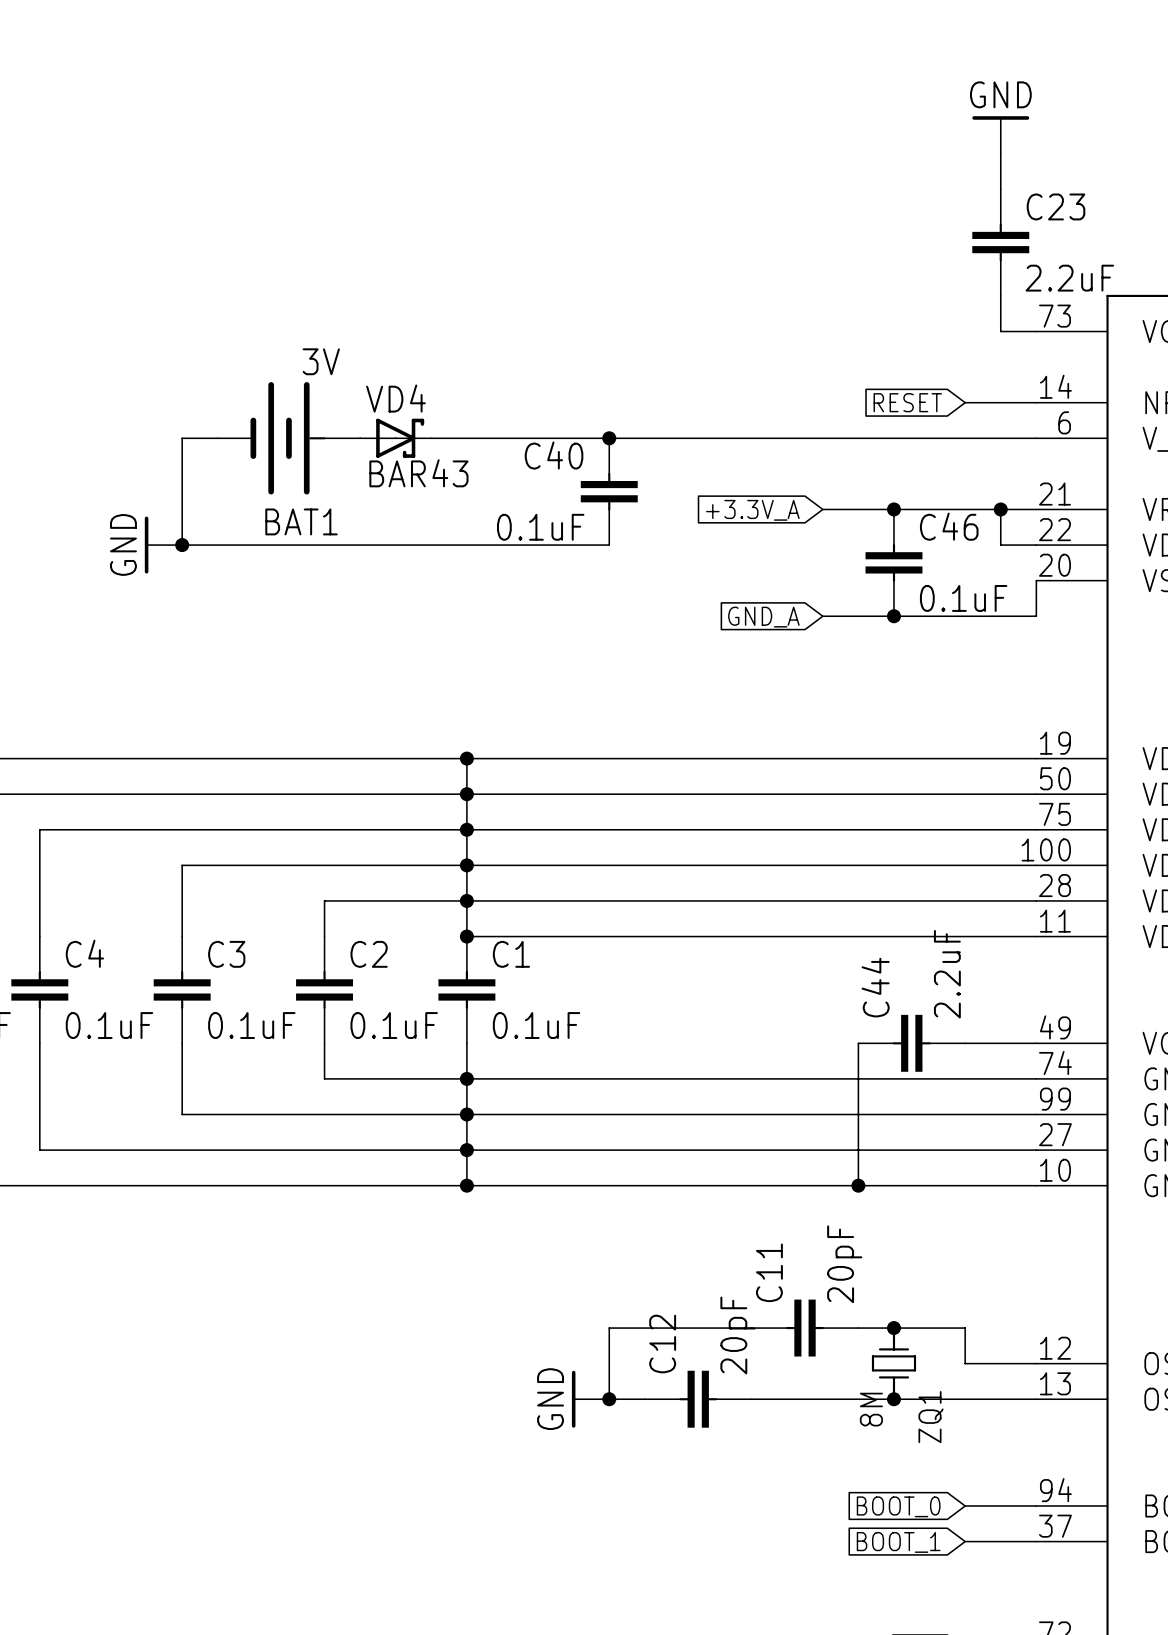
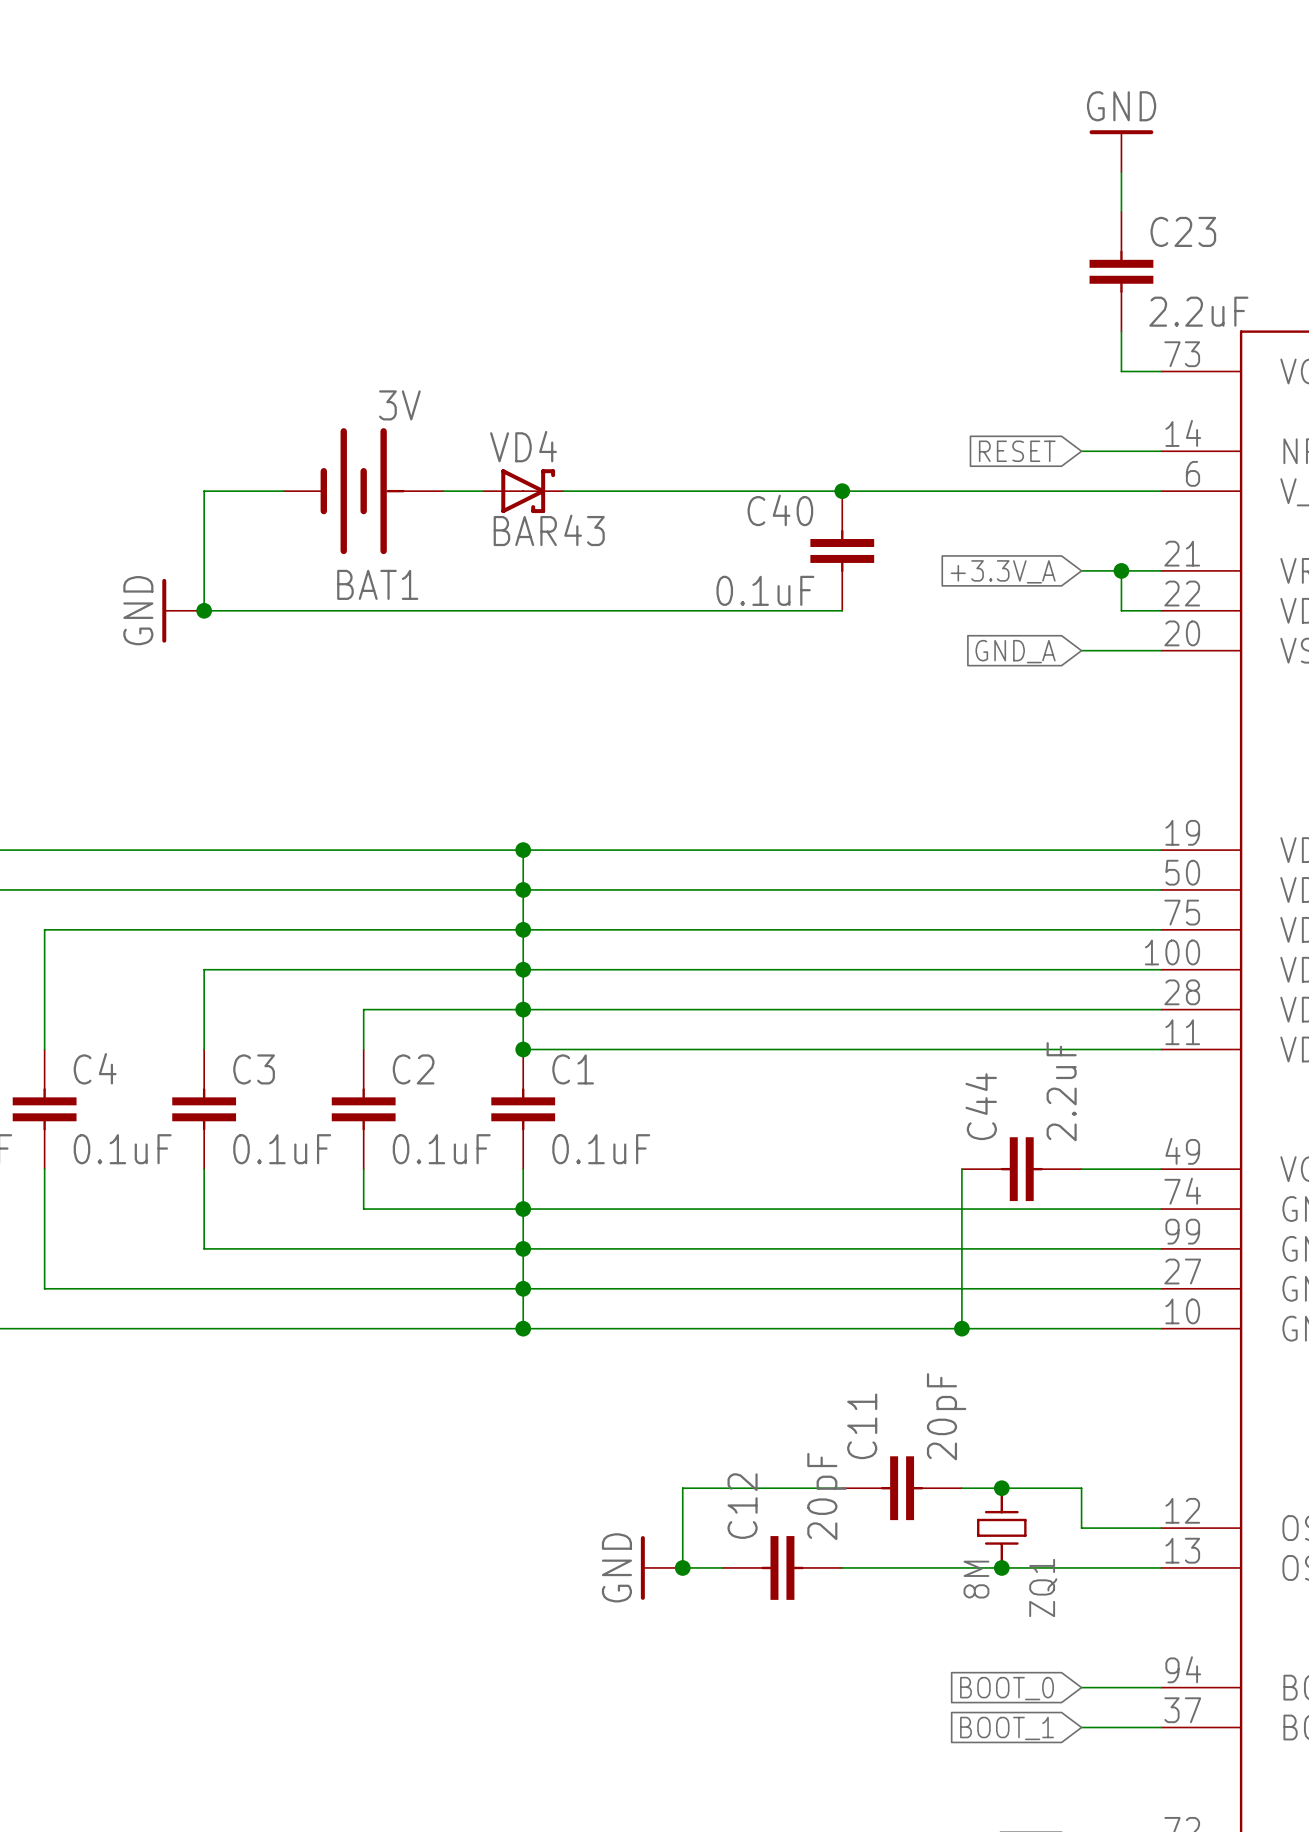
BAT1 position: (288, 438) -> (363, 491)
VD4 position: (395, 438) -> (523, 491)
junction: (609, 438) -> none
junction: none -> (842, 491)
C40 position: (609, 491) -> (842, 550)
wire: (822, 509) (965, 509) -> (682, 610) (842, 610)
junction: (893, 509) -> none
global label position: +3.3V_A (752, 510) -> +3.3V_A (1003, 571)
C46: 0.1uF (893, 562) -> none
wire: (1036, 580) (1036, 616) (822, 616) -> (1161, 650) (1081, 650)
junction: (893, 616) -> none
global label position: GND_A (763, 617) -> GND_A (1015, 651)

